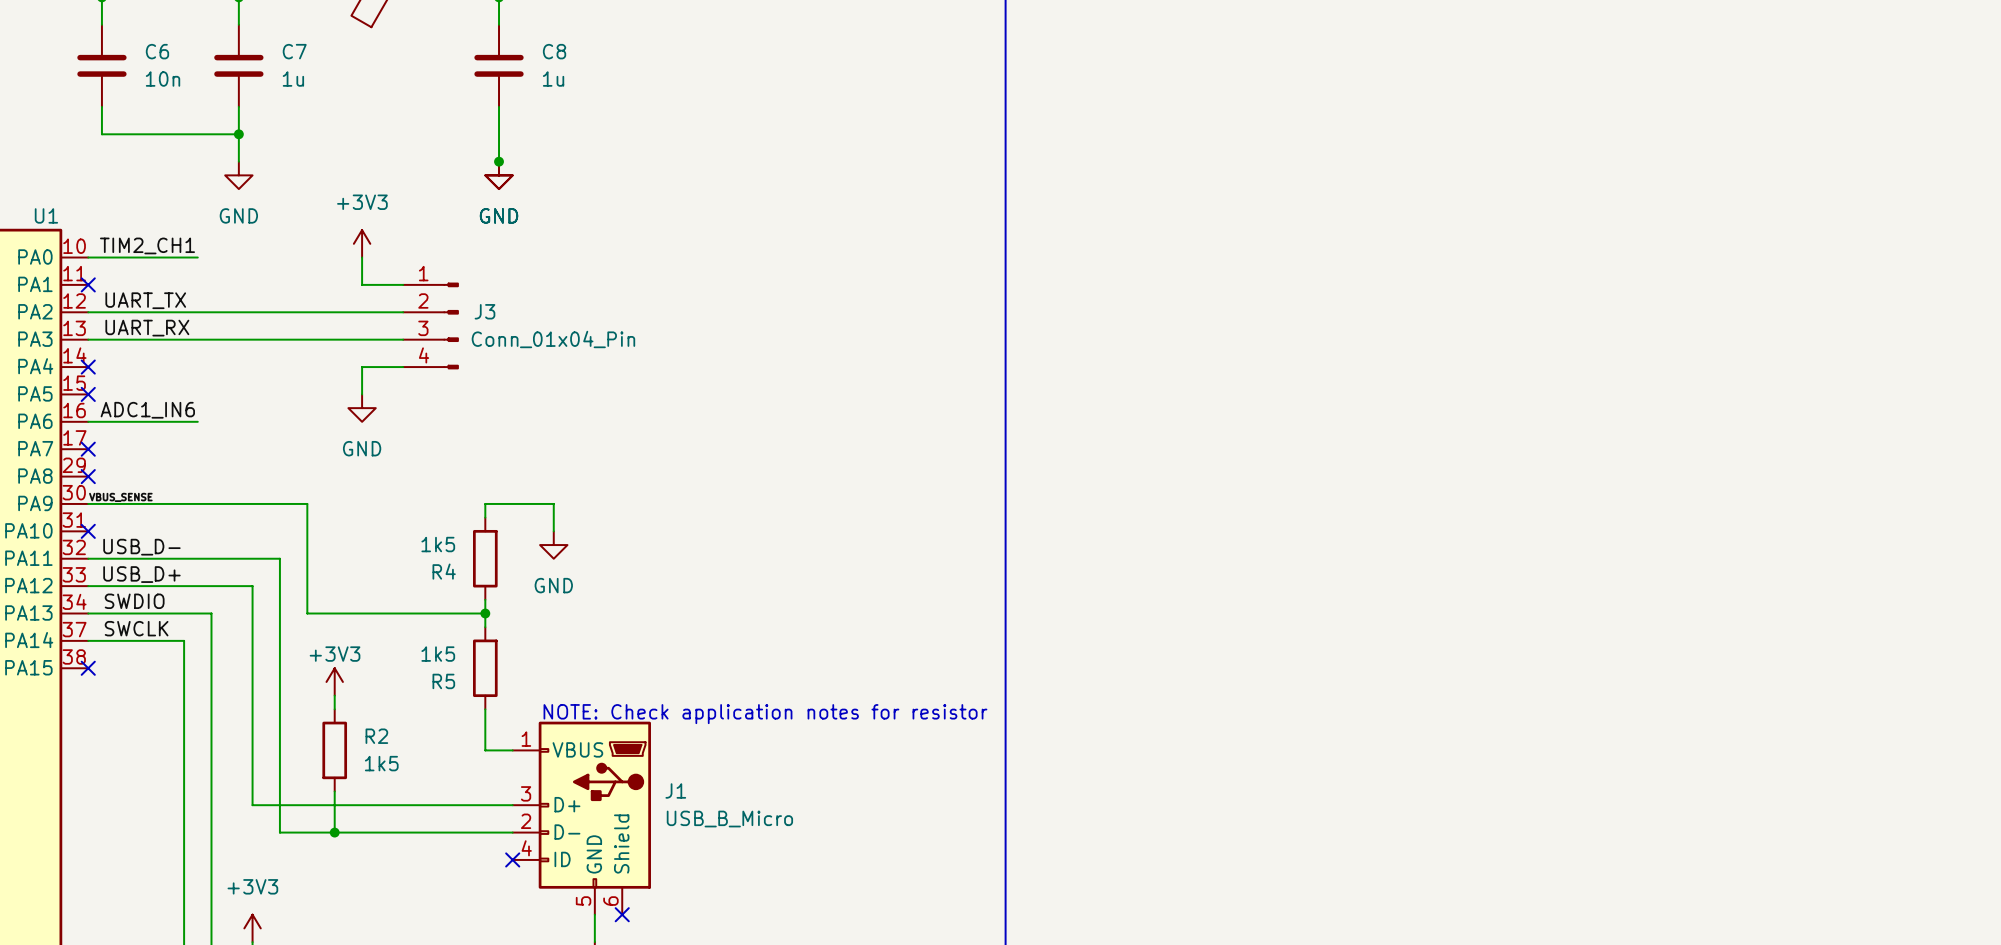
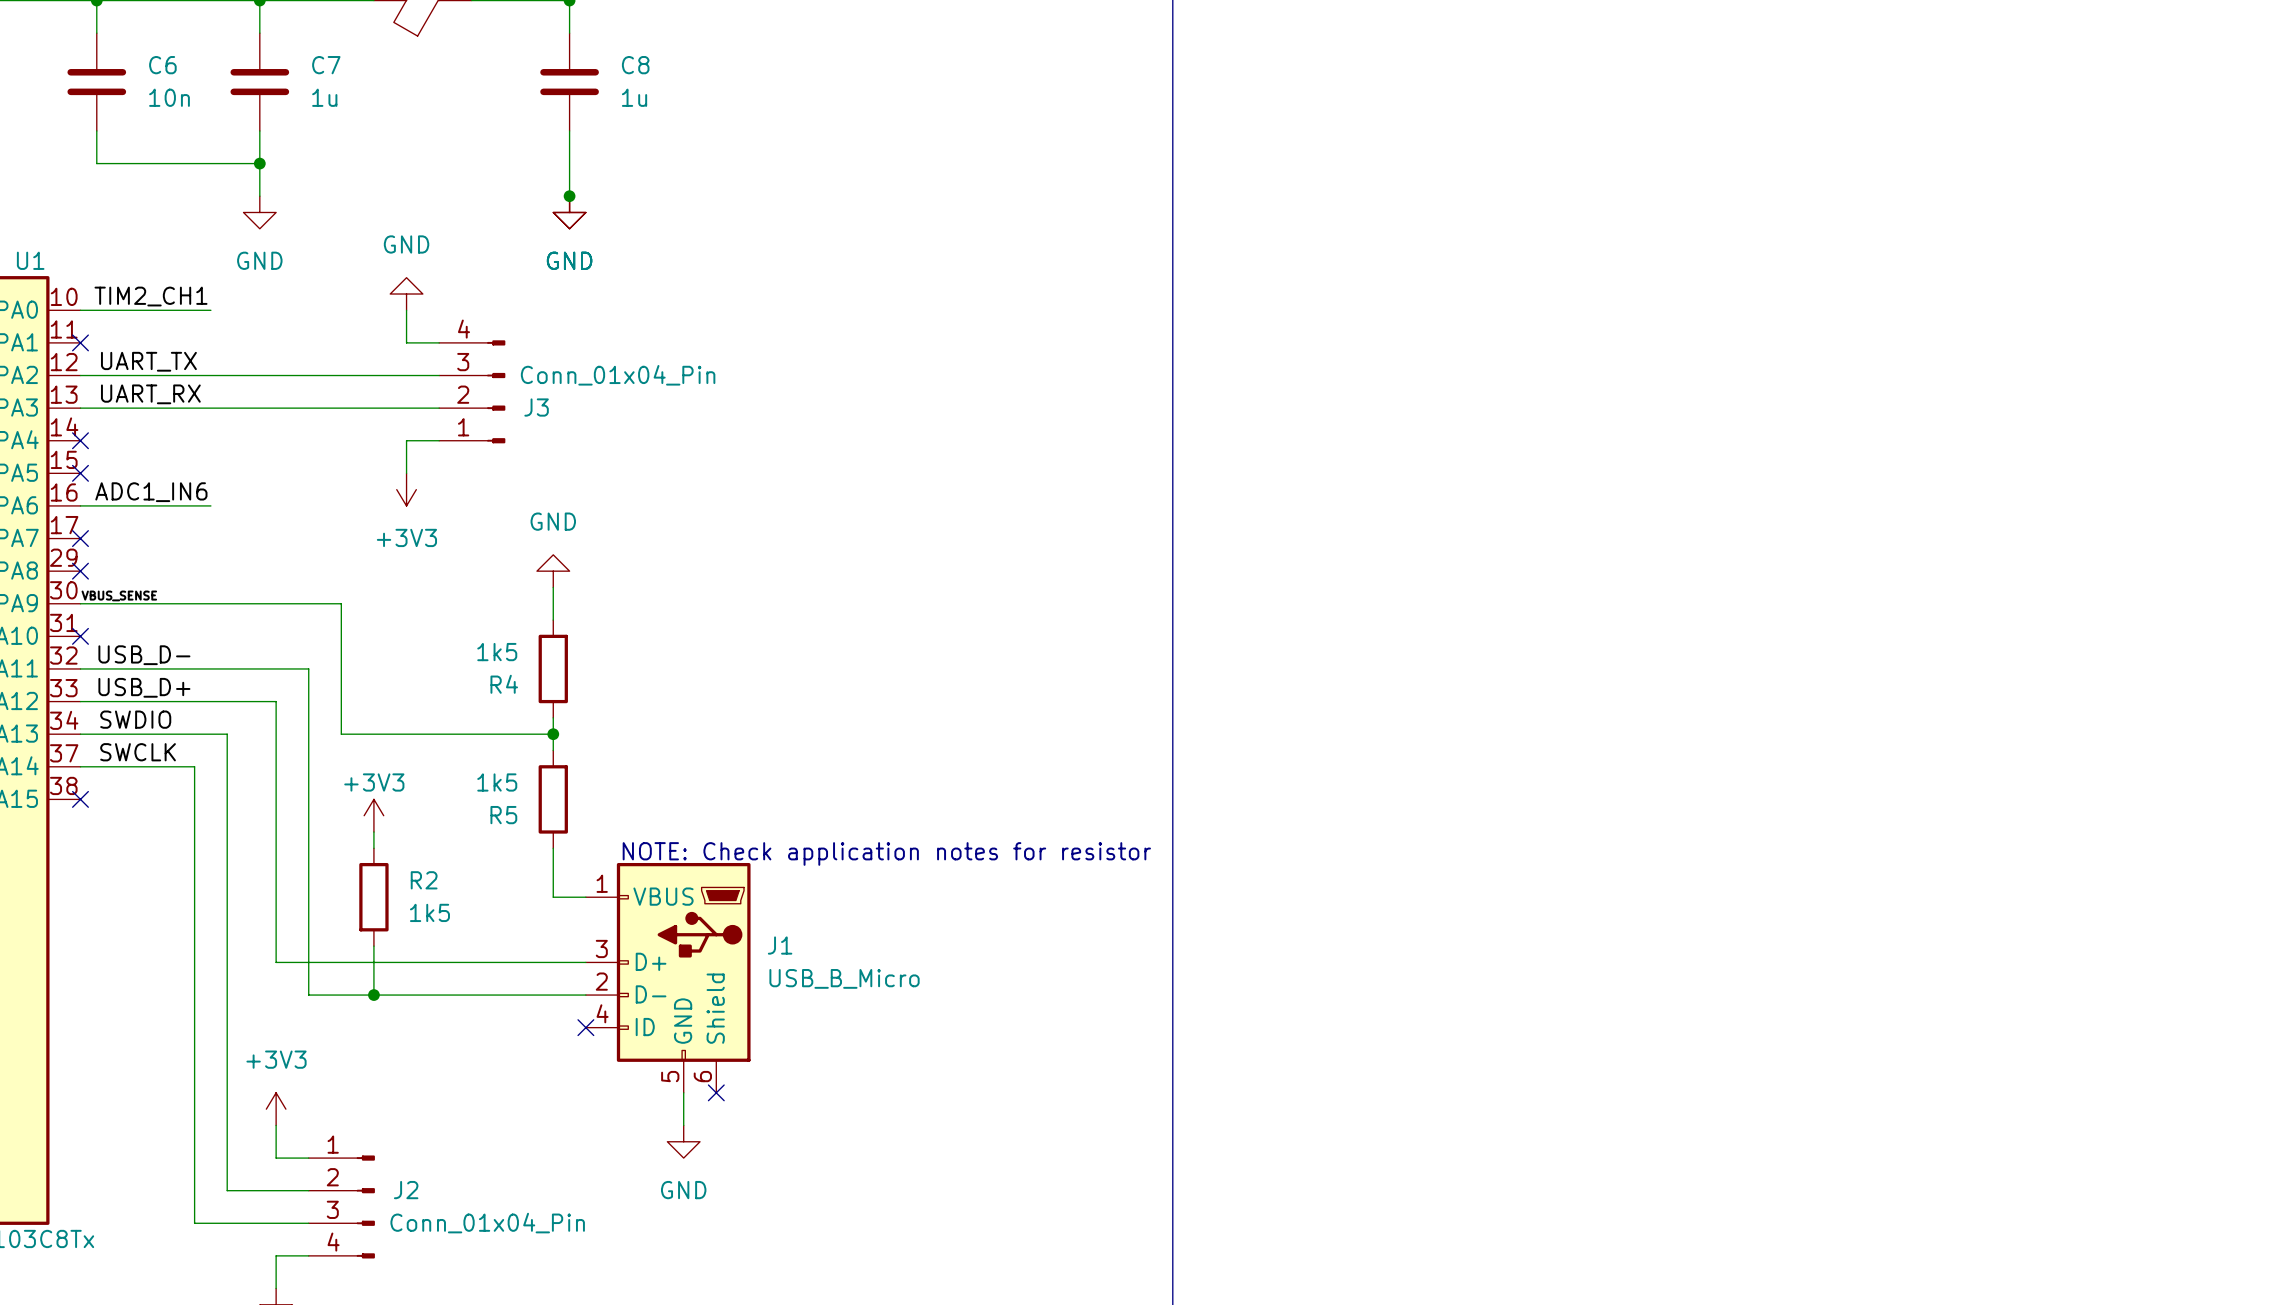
power symbol: +3V3 (362, 243) -> GND (406, 294)
J3 flip: as is (451, 325) -> up-down (496, 391)
power symbol: GND (362, 408) -> +3V3 (406, 489)
wire: (485, 503) (553, 503) (553, 531) -> (553, 603) (553, 587)
power symbol rotation: 0° (553, 545) -> 180° (553, 571)
power symbol position: GND (553, 545) -> GND (553, 571)

